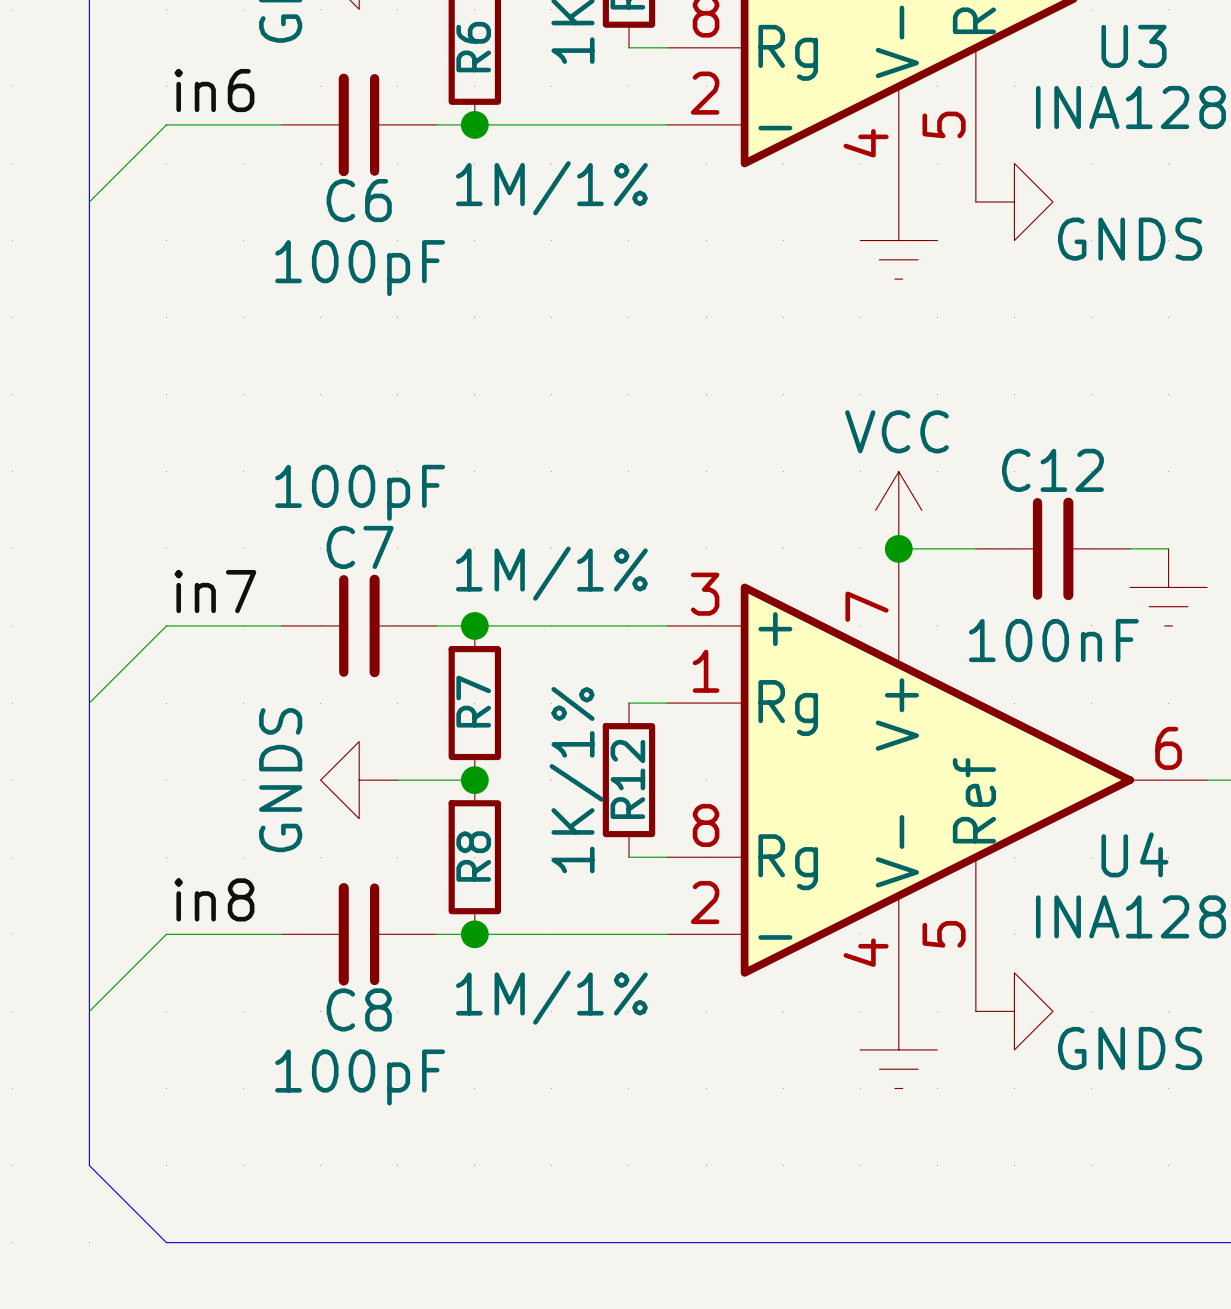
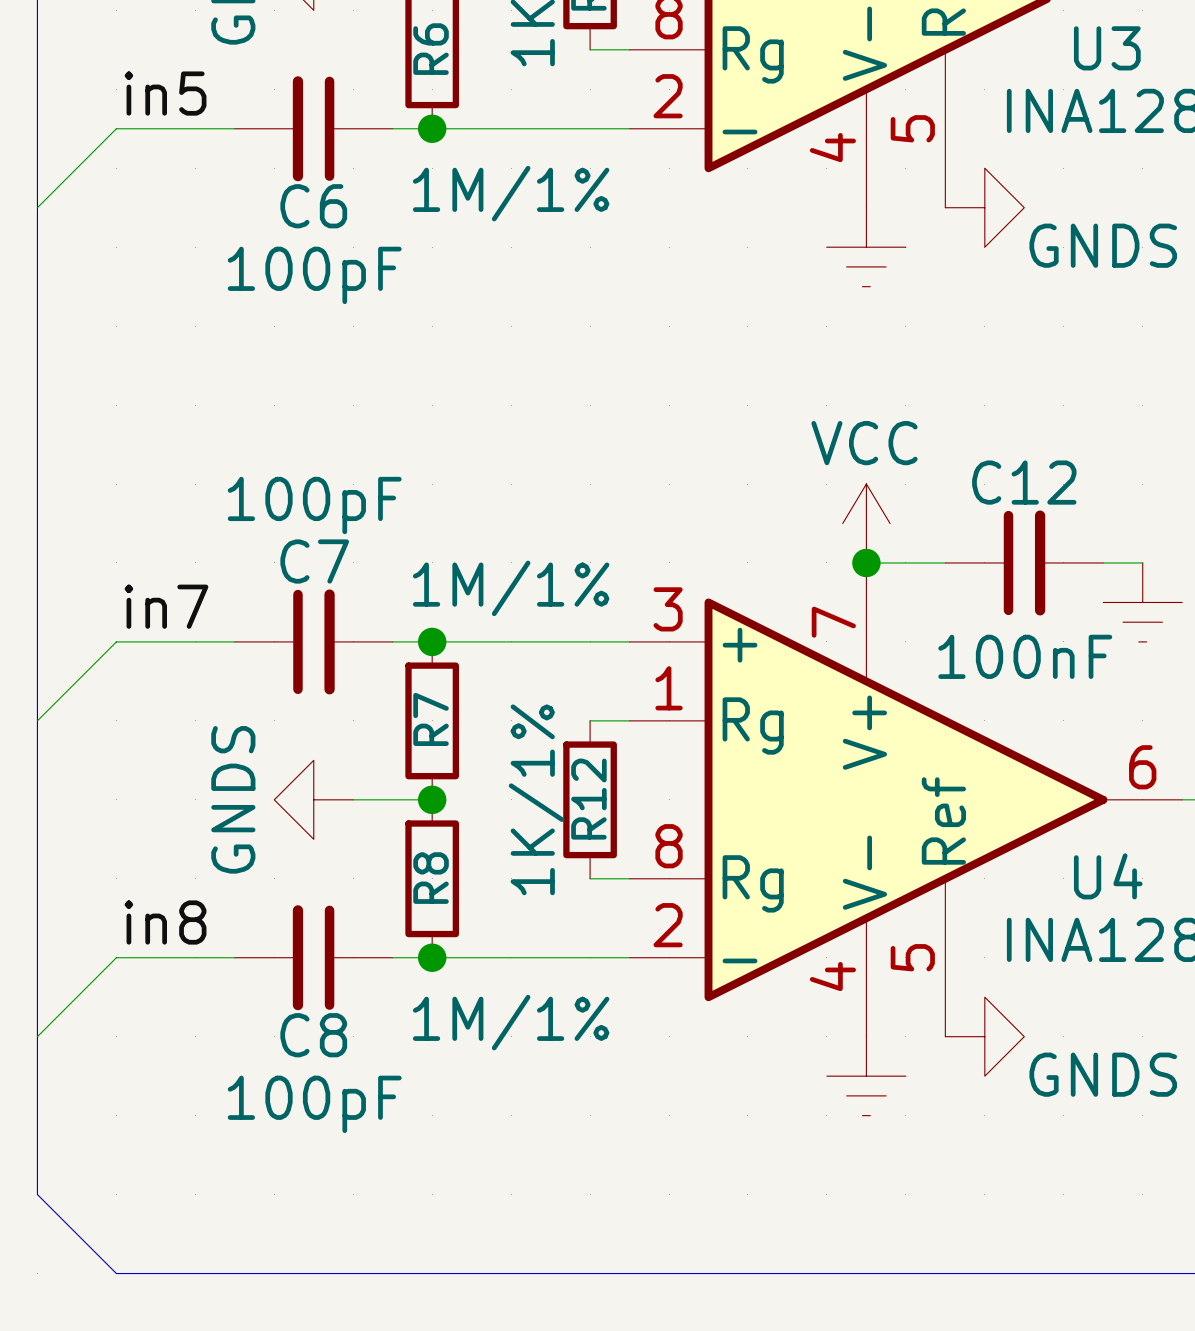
label: in6 (214, 90) -> in5 (165, 93)

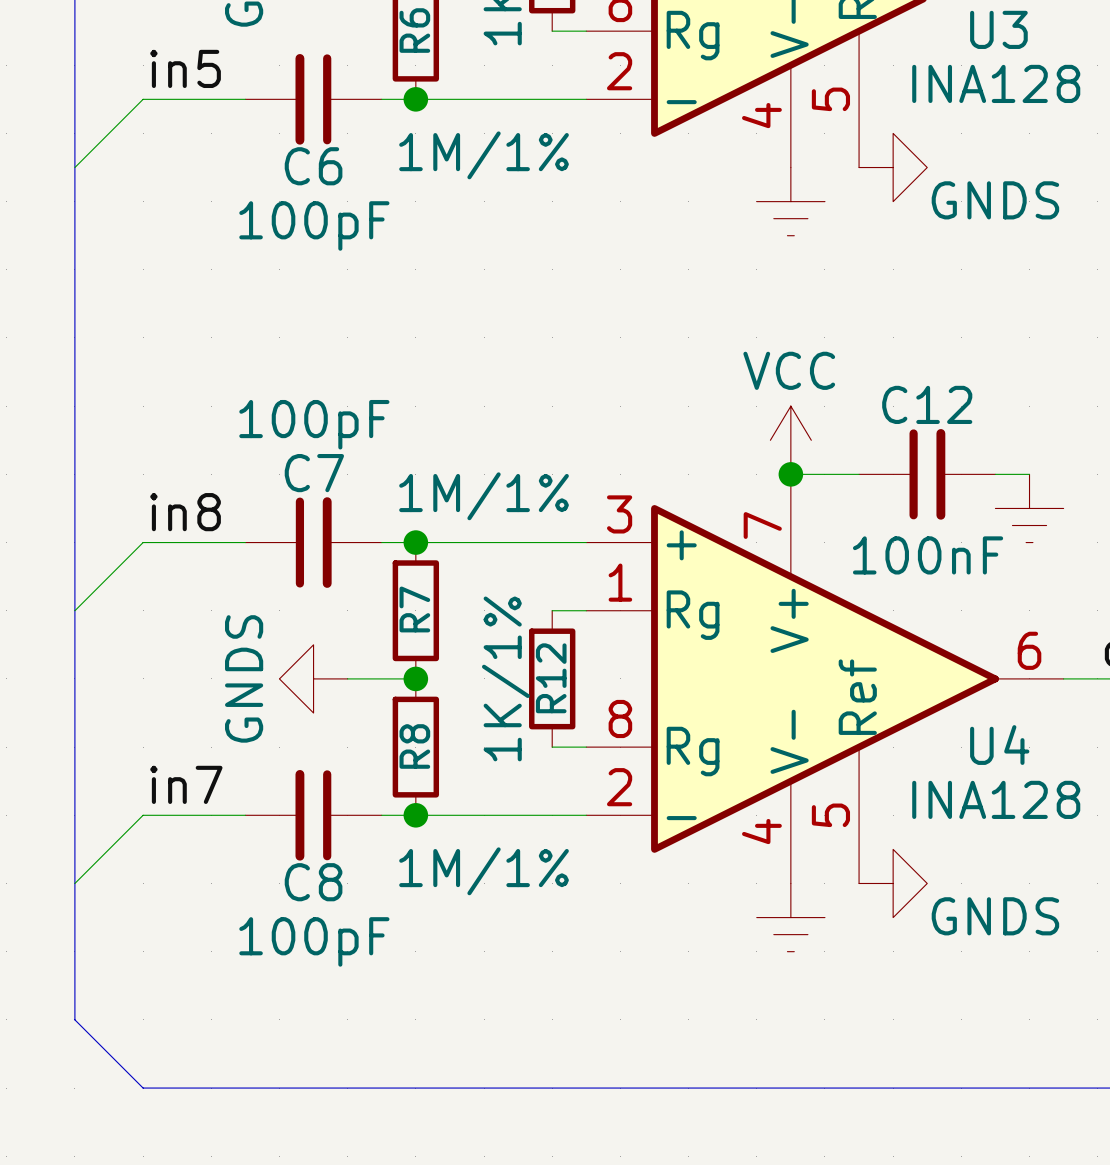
label: in7 (166, 606) -> in8 (185, 512)
label: in8 (165, 922) -> in7 (186, 784)

